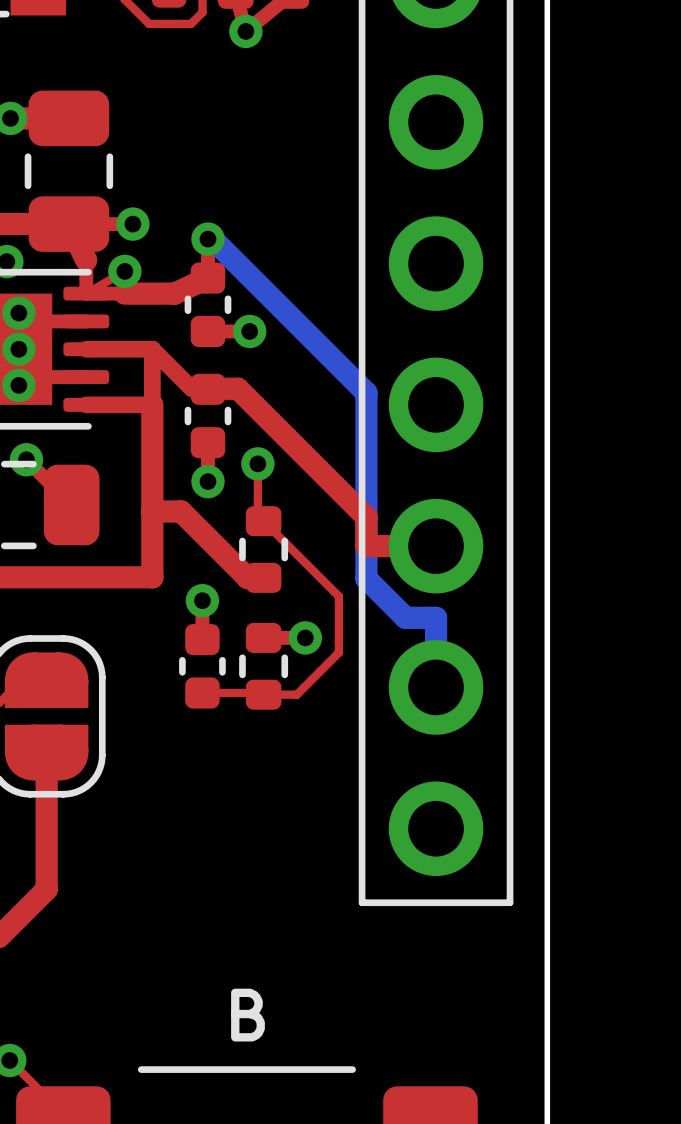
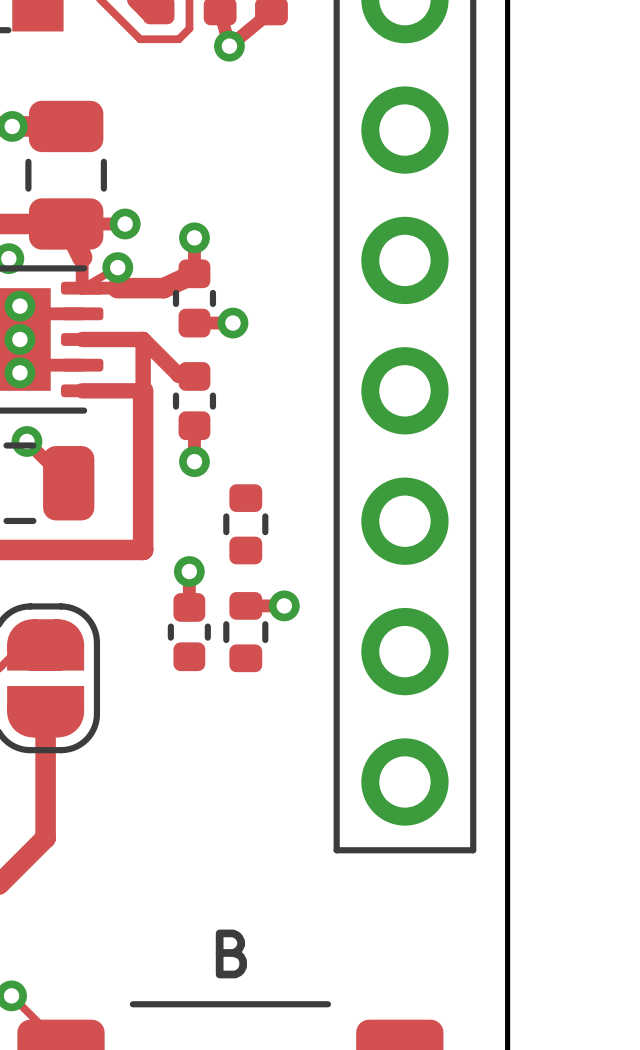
bottom track: (207, 239) (212, 239) (366, 392) (366, 578) (405, 617) (436, 617) (436, 687) -> none
top track: (199, 388) (237, 388) (366, 517) (366, 546) (436, 546) -> none
top track: (257, 463) (257, 515) (338, 596) (338, 652) (296, 694) (202, 693) -> none
via: (257, 463) -> none
top track: (152, 511) (181, 511) (247, 577) (263, 577) -> none

